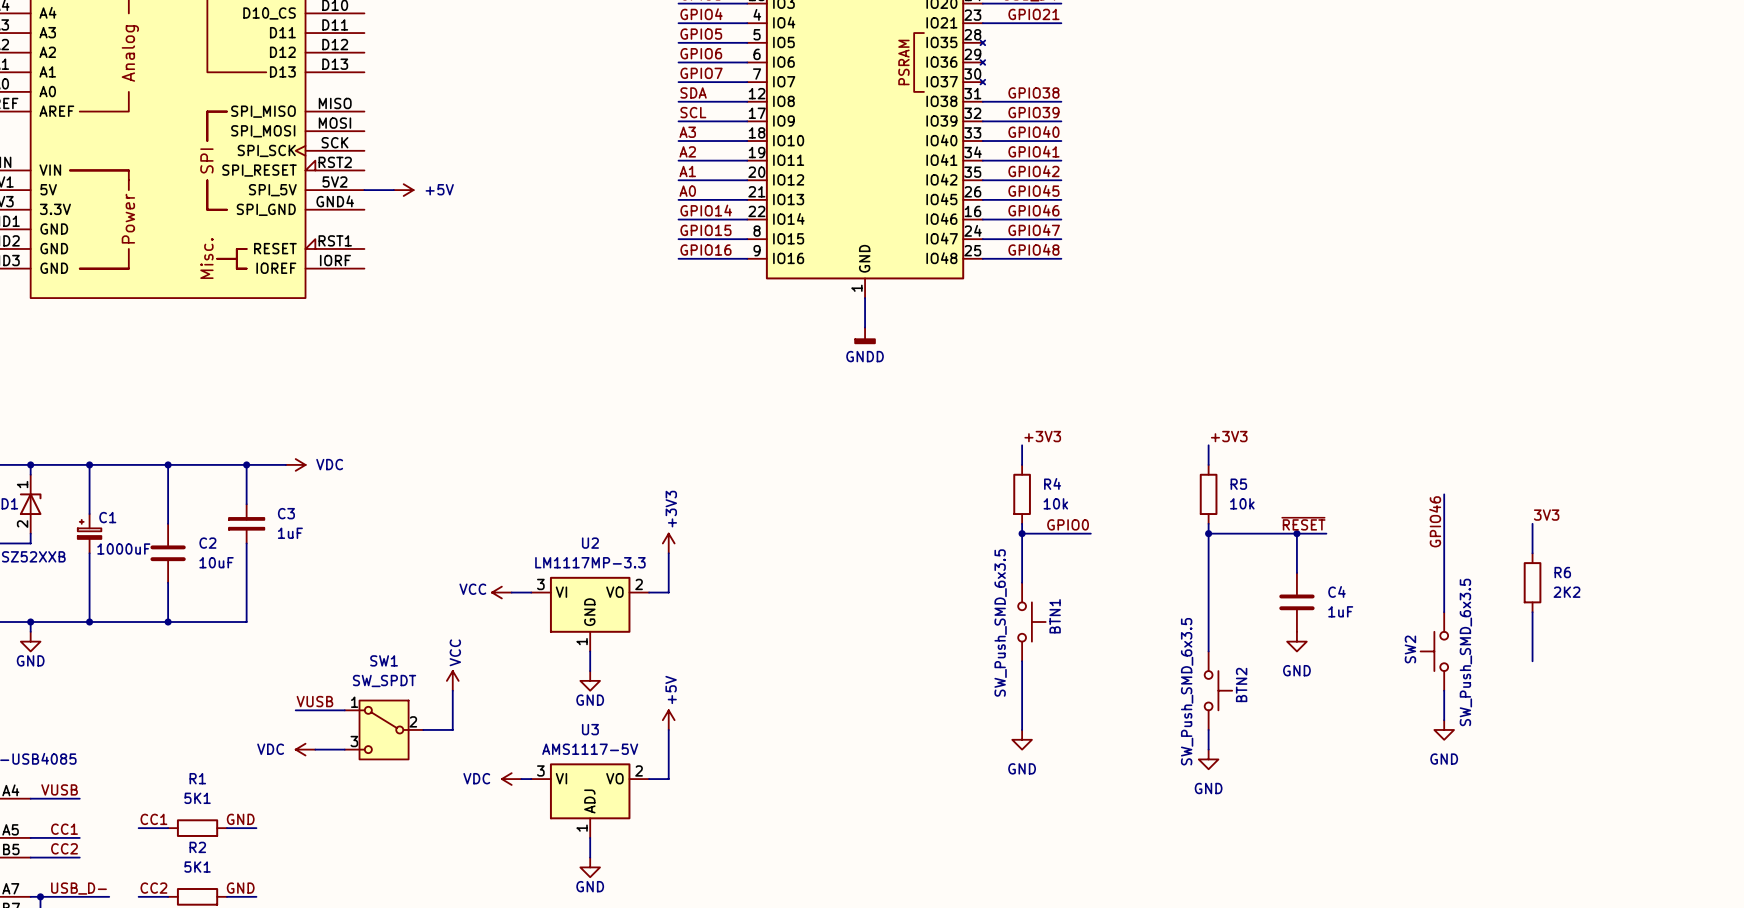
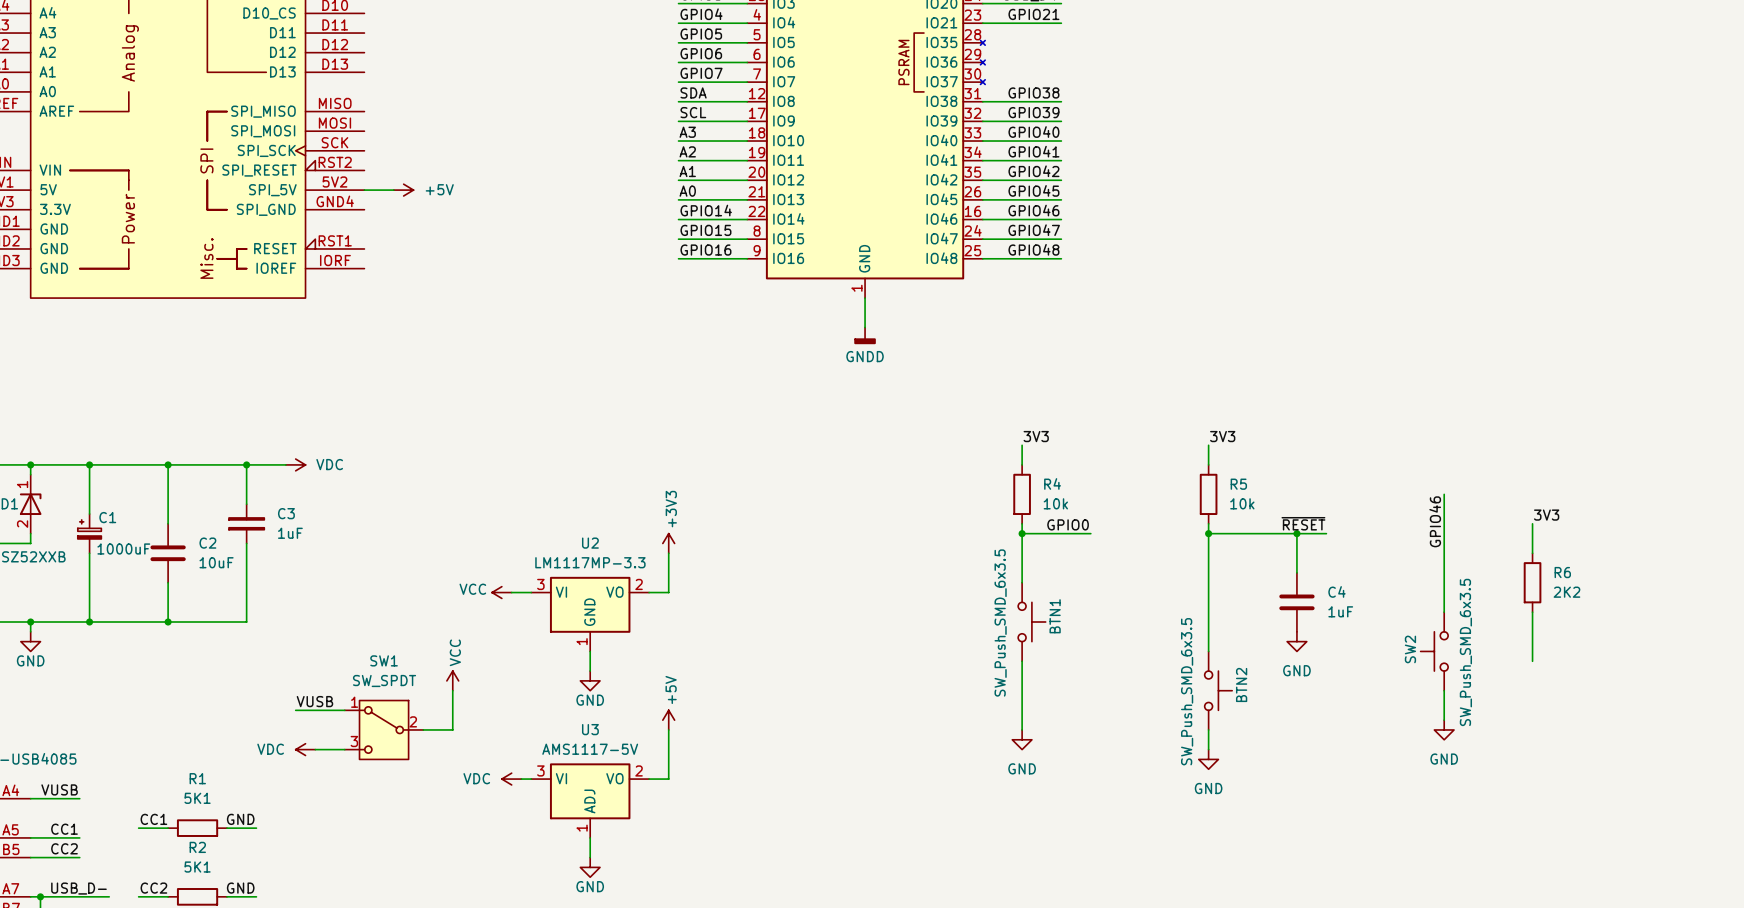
label: +3V3 (1042, 436) -> 3V3 (1036, 436)
label: +3V3 (1229, 436) -> 3V3 (1222, 436)

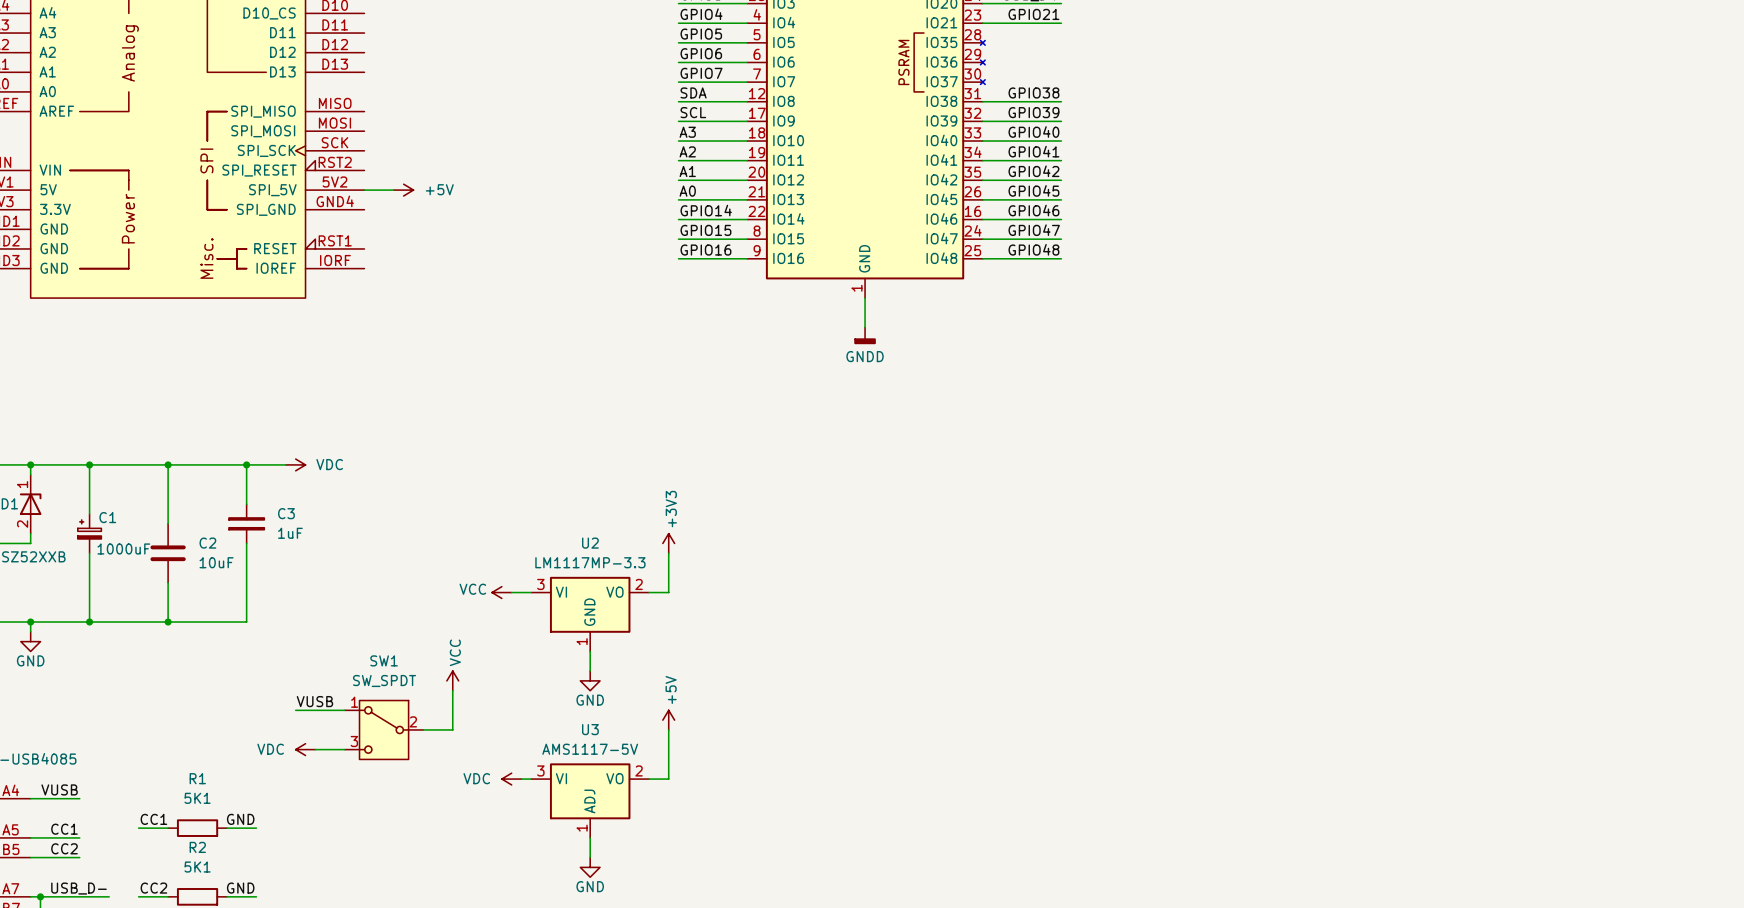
label: 3V3 (1036, 436) -> none
label: 3V3 (1222, 436) -> none
wire: (1022, 445) (1022, 464) -> none
wire: (1208, 445) (1208, 464) -> none
R4: 10k (1022, 494) -> none
R5: 10k (1208, 494) -> none
wire: (1444, 494) (1444, 612) -> none
label: 3V3 (1546, 515) -> none
label: GPIO46 (1435, 521) -> none
wire: (1022, 523) (1022, 582) -> none
wire: (1208, 523) (1208, 651) -> none
label: ~{RESET} (1303, 523) -> none
wire: (1532, 523) (1532, 553) -> none
label: GPIO0 (1068, 524) -> none
wire: (1022, 533) (1090, 533) -> none
junction: (1022, 533) -> none
wire: (1208, 533) (1326, 533) -> none
junction: (1208, 533) -> none
wire: (1296, 533) (1296, 572) -> none
junction: (1296, 533) -> none
R6: 2K2 (1532, 582) -> none
C4: 1uF (1296, 602) -> none
wire: (1532, 612) (1532, 661) -> none
BTN1: SW_Push_SMD_6x3.5 (1031, 622) -> none
power symbol: GND (1296, 641) -> none
SW2: SW_Push_SMD_6x3.5 (1434, 651) -> none
wire: (1022, 661) (1022, 729) -> none
BTN2: SW_Push_SMD_6x3.5 (1218, 690) -> none
wire: (1444, 690) (1444, 720) -> none
wire: (1208, 729) (1208, 749) -> none
power symbol: GND (1444, 729) -> none
power symbol: GND (1022, 739) -> none
power symbol: GND (1208, 759) -> none

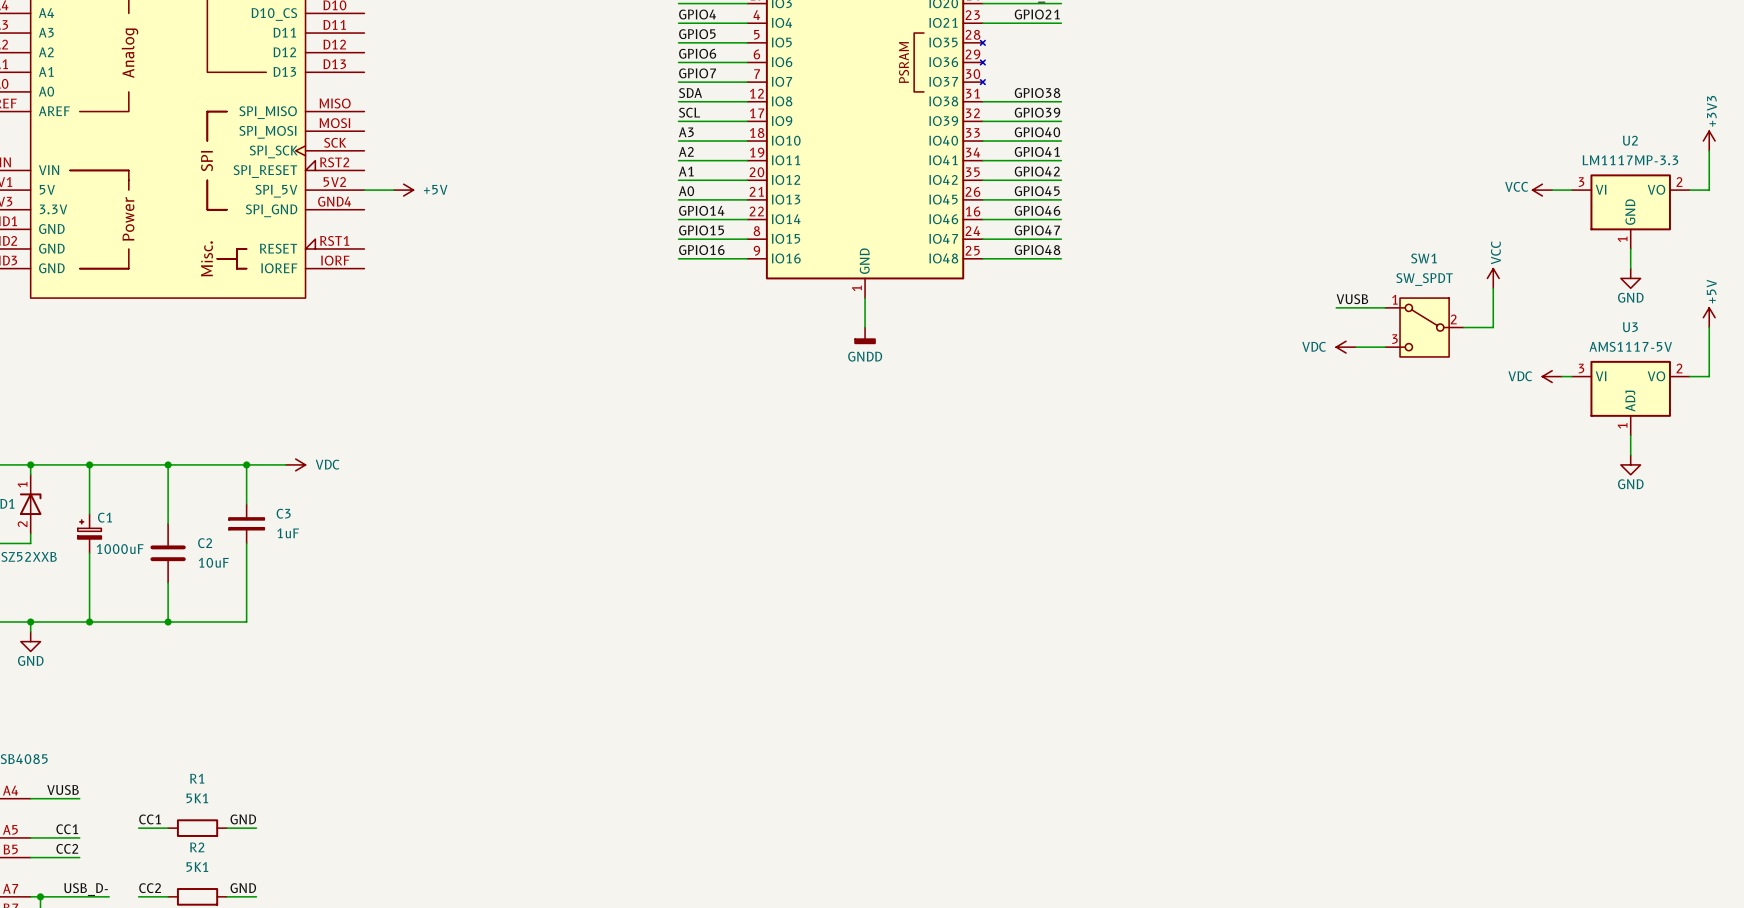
power symbol: none -> +3V3 (1709, 141)
wire: none -> (1709, 150) (1709, 190) (1689, 190)
power symbol: none -> VCC (1542, 190)
wire: none -> (1552, 190) (1571, 190)
wire: none -> (1630, 248) (1630, 268)
power symbol: none -> VCC (1493, 278)
power symbol: none -> GND (1630, 278)
wire: none -> (1493, 288) (1493, 327) (1463, 327)
label: none -> VUSB (1352, 299)
wire: none -> (1336, 307) (1385, 307)
power symbol: none -> +5V (1709, 317)
wire: none -> (1709, 327) (1709, 376) (1689, 376)
power symbol: none -> VDC (1346, 347)
wire: none -> (1355, 347) (1385, 347)
power symbol: none -> VDC (1552, 376)
wire: none -> (1561, 376) (1571, 376)
wire: none -> (1630, 435) (1630, 455)
power symbol: none -> GND (1630, 464)
power symbol: +3V3 (668, 543) -> none
wire: (668, 553) (668, 592) (649, 592) -> none
power symbol: VCC (501, 592) -> none
wire: (511, 592) (531, 592) -> none
U2 position: (590, 614) -> (1630, 211)
wire: (590, 651) (590, 671) -> none
power symbol: VCC (452, 680) -> none
power symbol: GND (590, 680) -> none
wire: (452, 690) (452, 729) (423, 729) -> none
label: VUSB (314, 701) -> none
wire: (295, 710) (344, 710) -> none
power symbol: +5V (668, 720) -> none
SW1 position: (384, 729) -> (1424, 327)
wire: (668, 729) (668, 779) (649, 779) -> none
power symbol: VDC (305, 749) -> none
wire: (315, 749) (344, 749) -> none
power symbol: VDC (511, 779) -> none
wire: (521, 779) (531, 779) -> none
U3 position: (590, 800) -> (1630, 398)
wire: (590, 837) (590, 857) -> none
power symbol: GND (590, 867) -> none

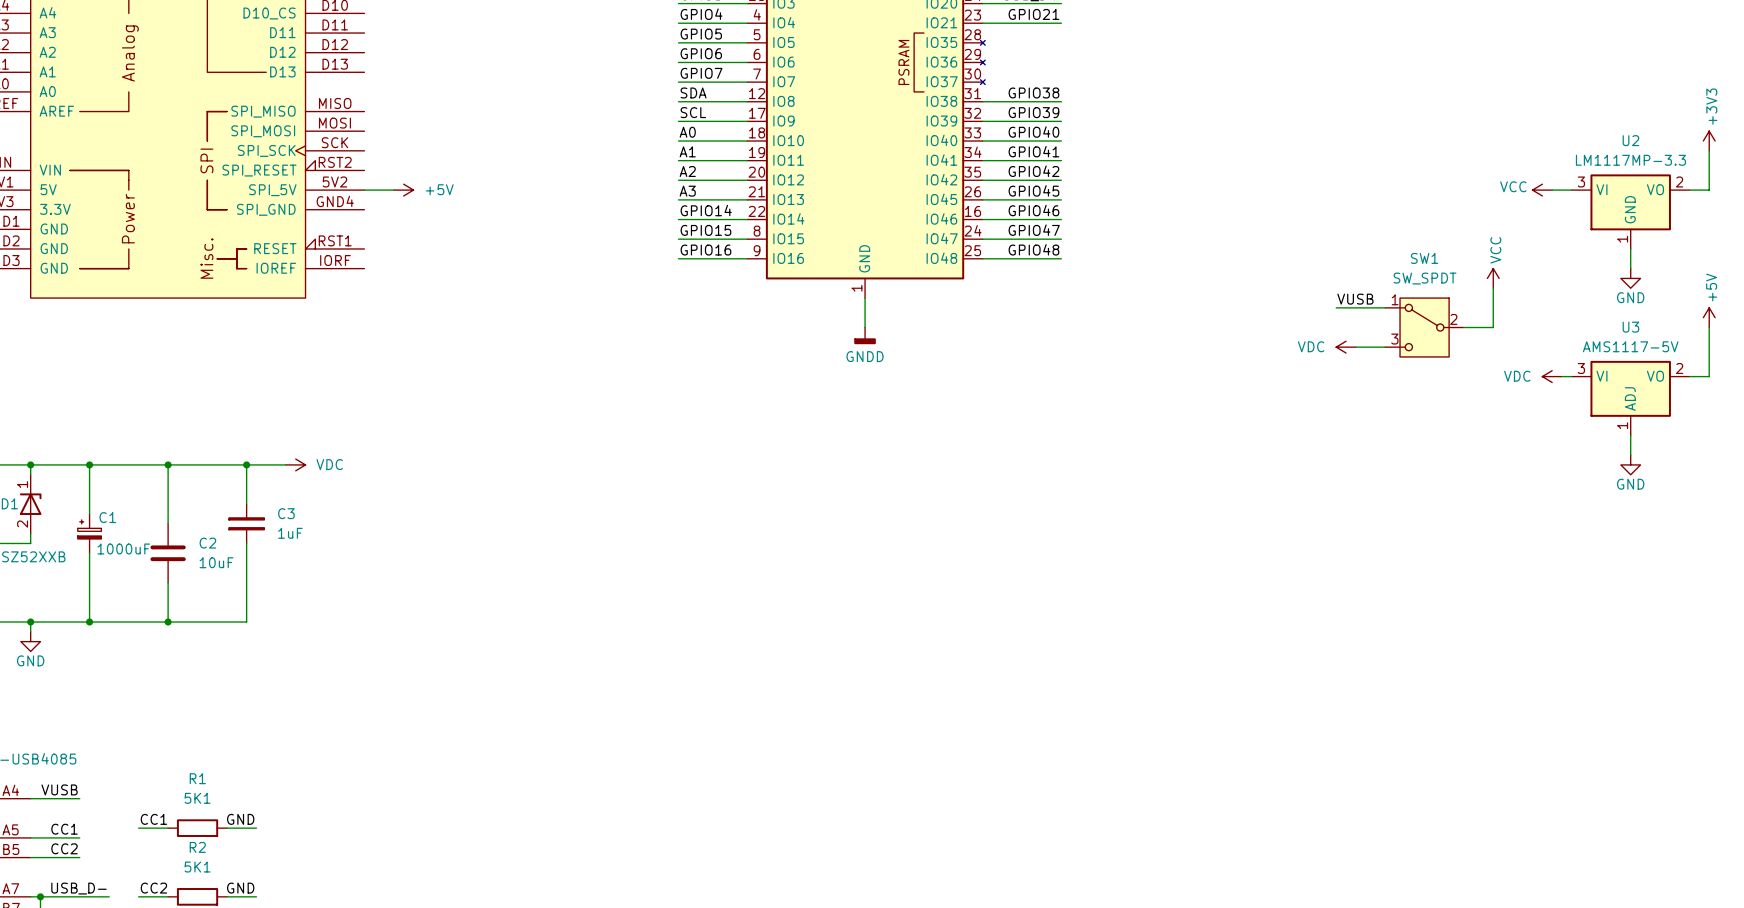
label: A3 (686, 132) -> A0 (687, 132)
label: A2 (686, 151) -> A1 (687, 151)
label: A1 (686, 171) -> A2 (687, 171)
label: A0 (686, 191) -> A3 (687, 191)

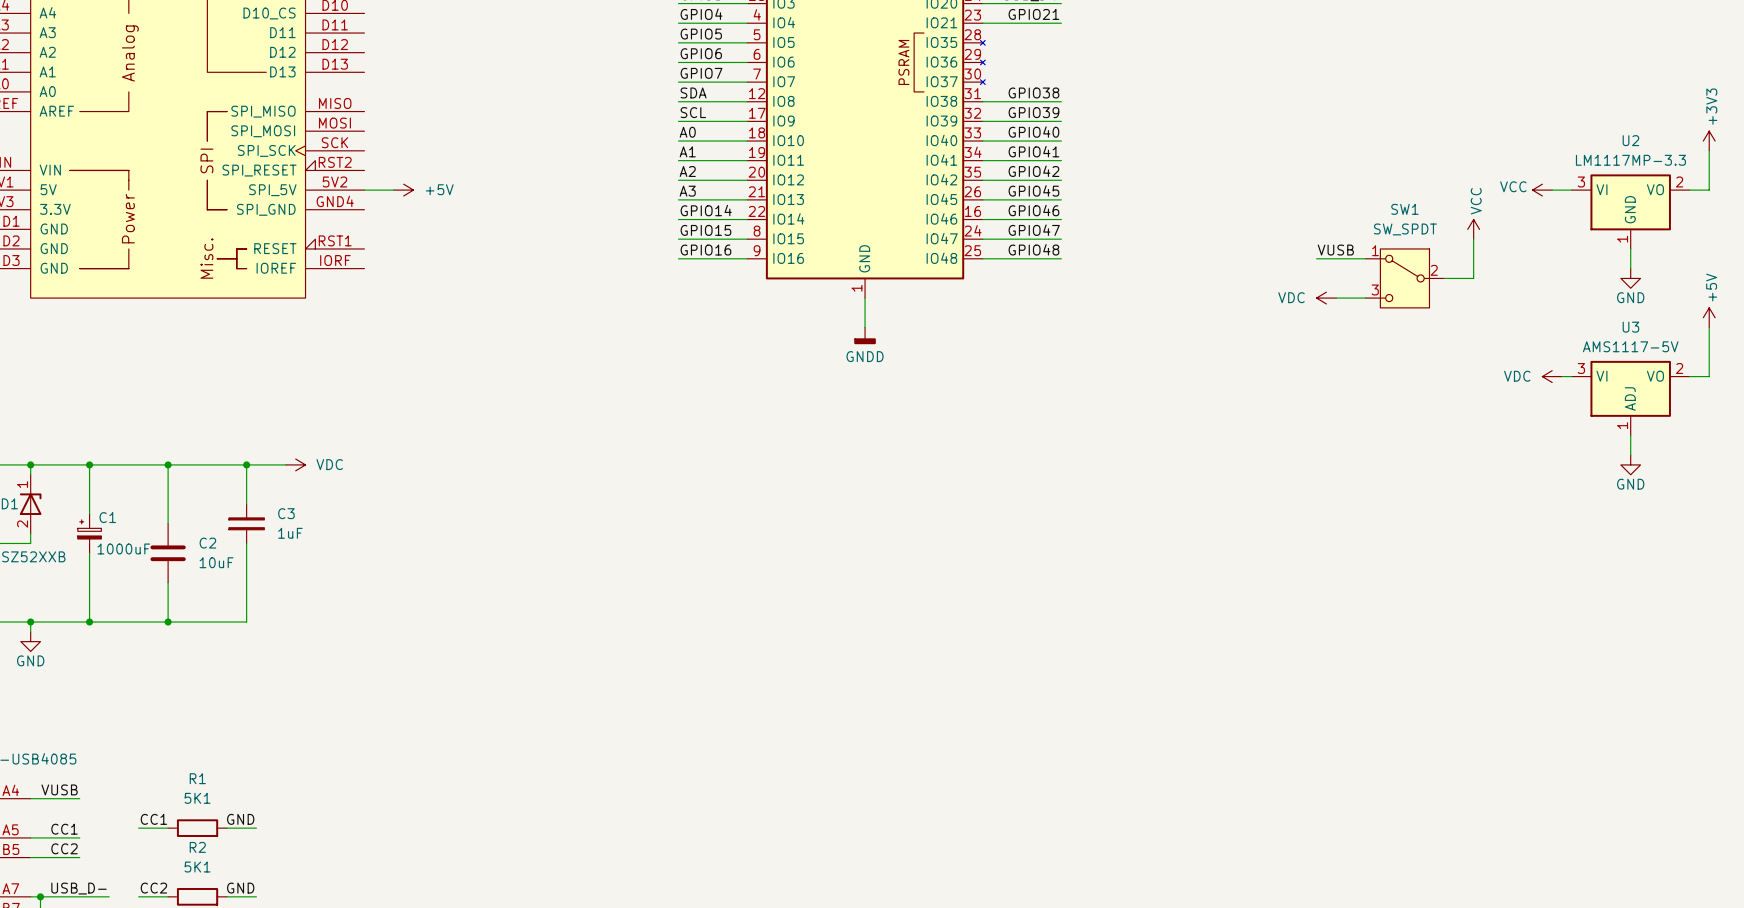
power symbol position: VCC (1493, 278) -> VCC (1473, 229)
wire: (1493, 288) (1493, 327) (1463, 327) -> (1473, 239) (1473, 278) (1444, 278)
label position: VUSB (1355, 299) -> VUSB (1335, 250)
wire: (1336, 307) (1385, 307) -> (1316, 258) (1365, 258)
SW1 position: (1424, 327) -> (1404, 278)
power symbol position: VDC (1346, 347) -> VDC (1326, 298)
wire: (1355, 347) (1385, 347) -> (1336, 298) (1365, 298)

